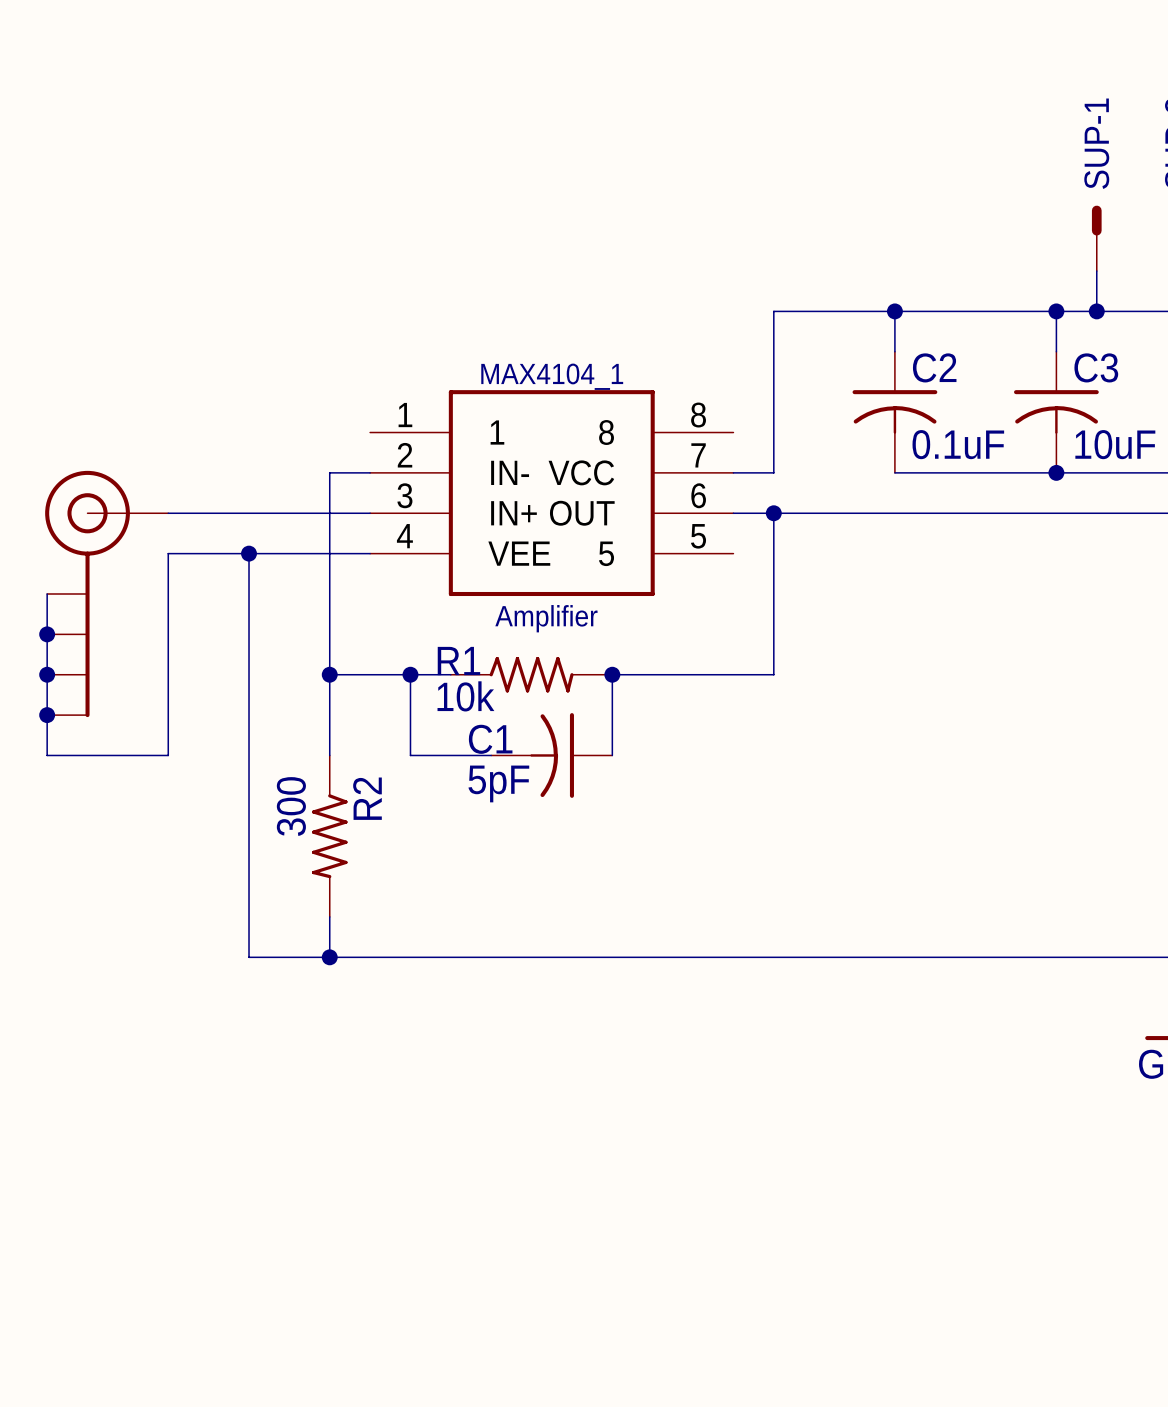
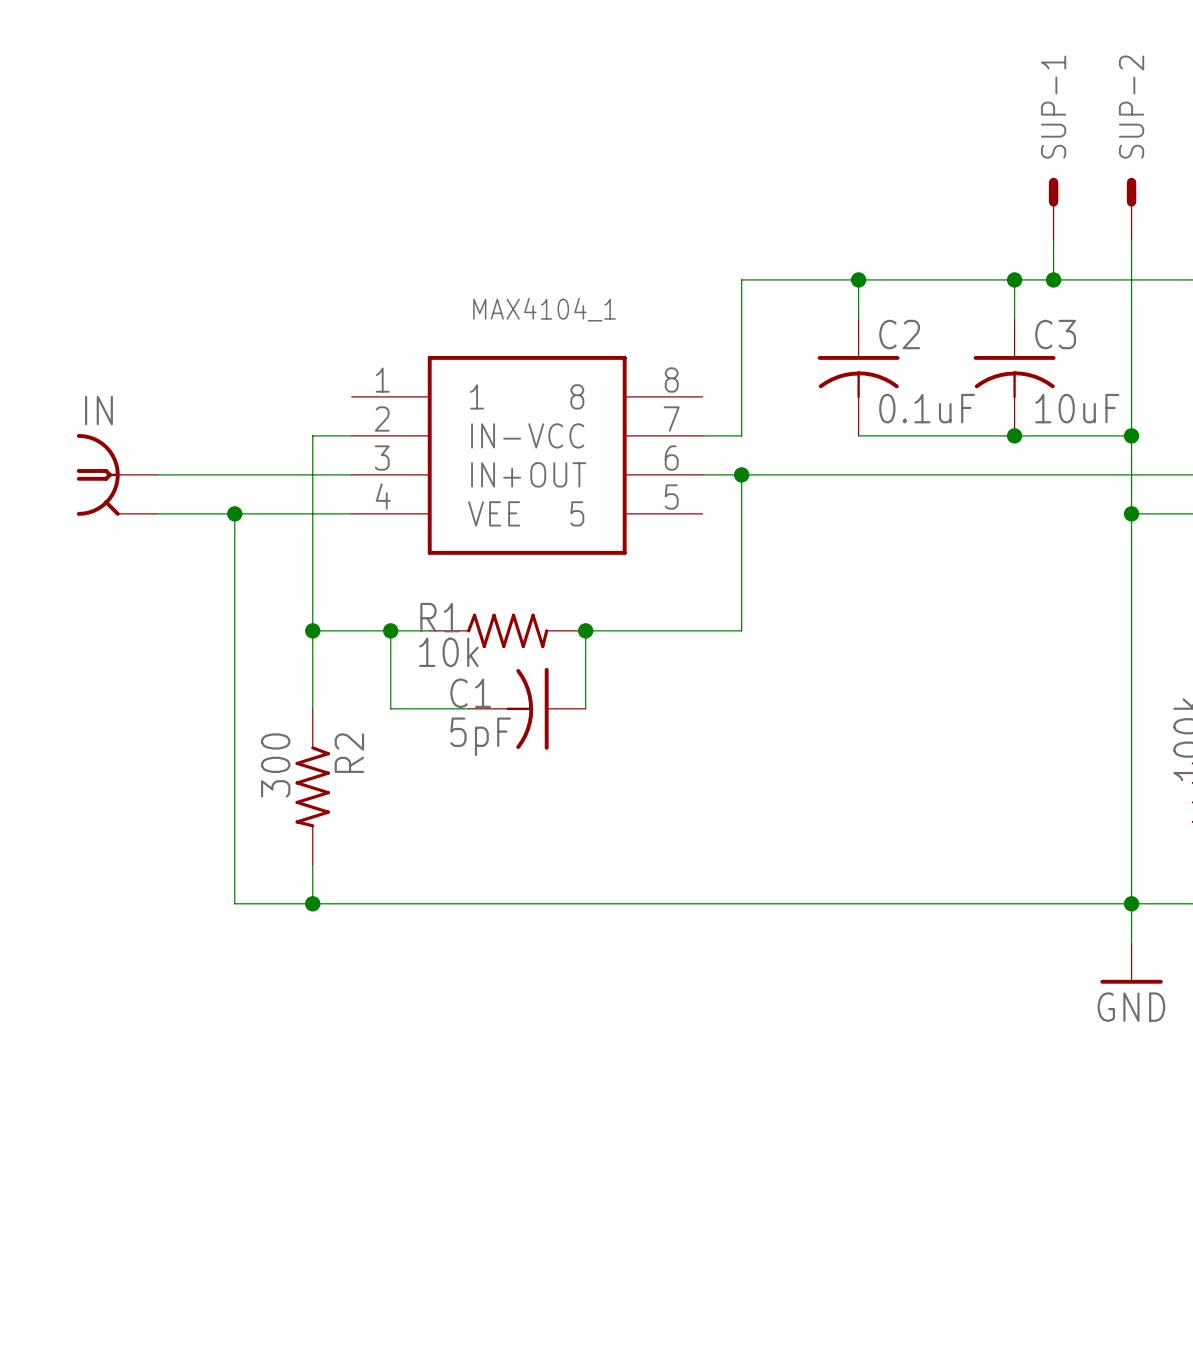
MAX4104_1 name position: MAX4104_1 (552, 376) -> MAX4104_1 (544, 309)
IN: none -> (116, 474)
wire: (168, 553) (168, 755) (47, 755) (47, 593) -> none
part: (106, 593) -> none
MAX4104_1 value: Amplifier (546, 618) -> none
junction: (47, 634) -> none
junction: (47, 674) -> none
junction: (47, 715) -> none

